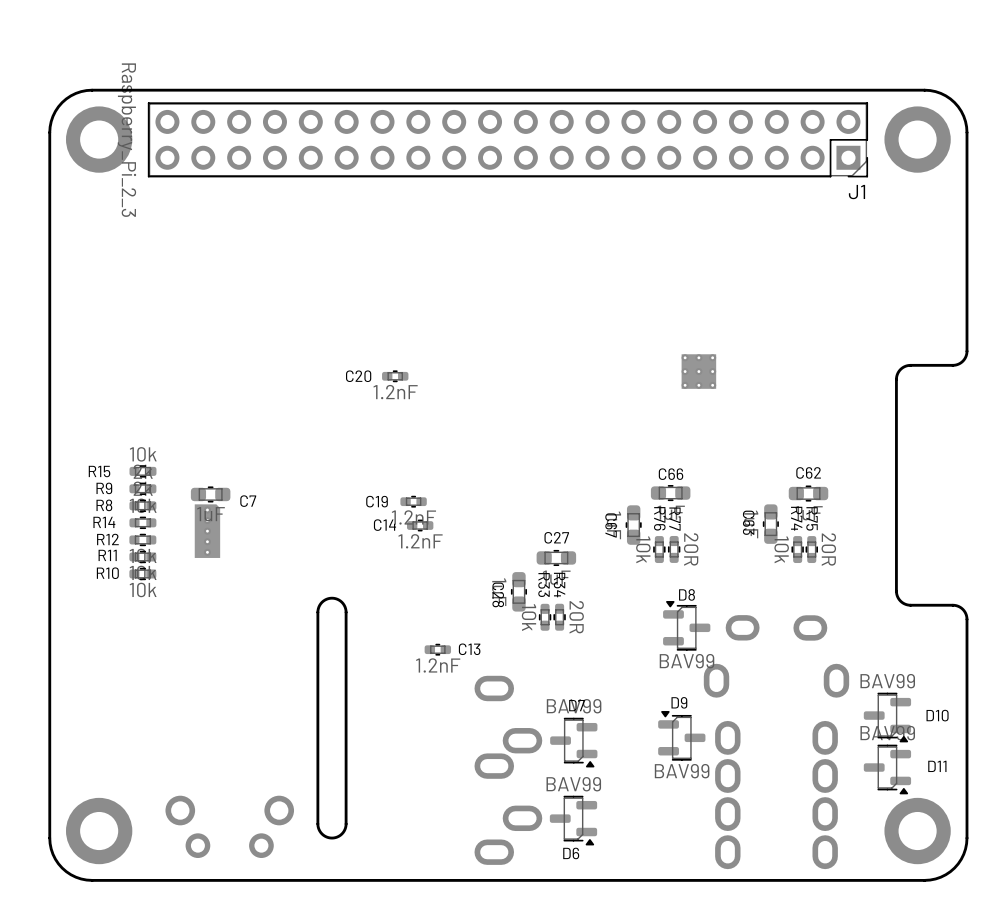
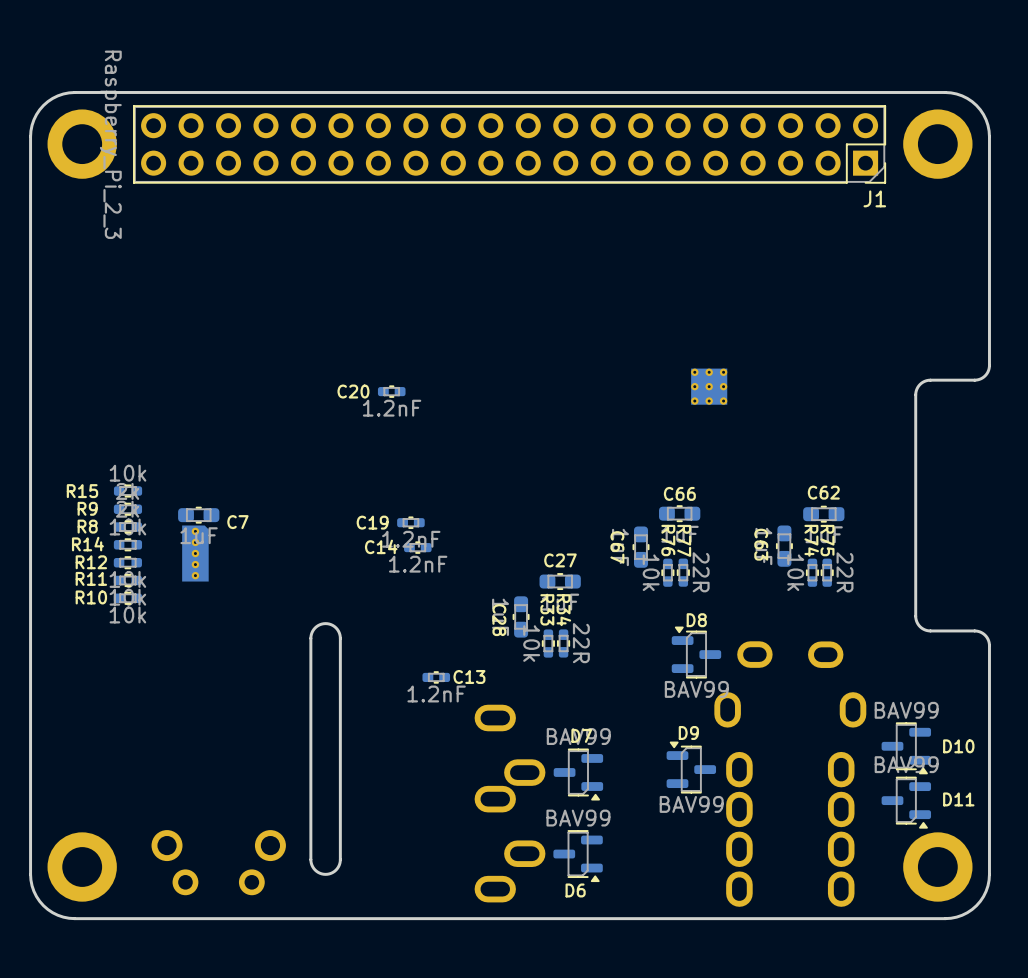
R77 value: 20R (691, 549) -> 22R (701, 572)
R75 value: 20R (828, 549) -> 22R (845, 572)
R34 value: 20R (576, 617) -> 22R (581, 643)

